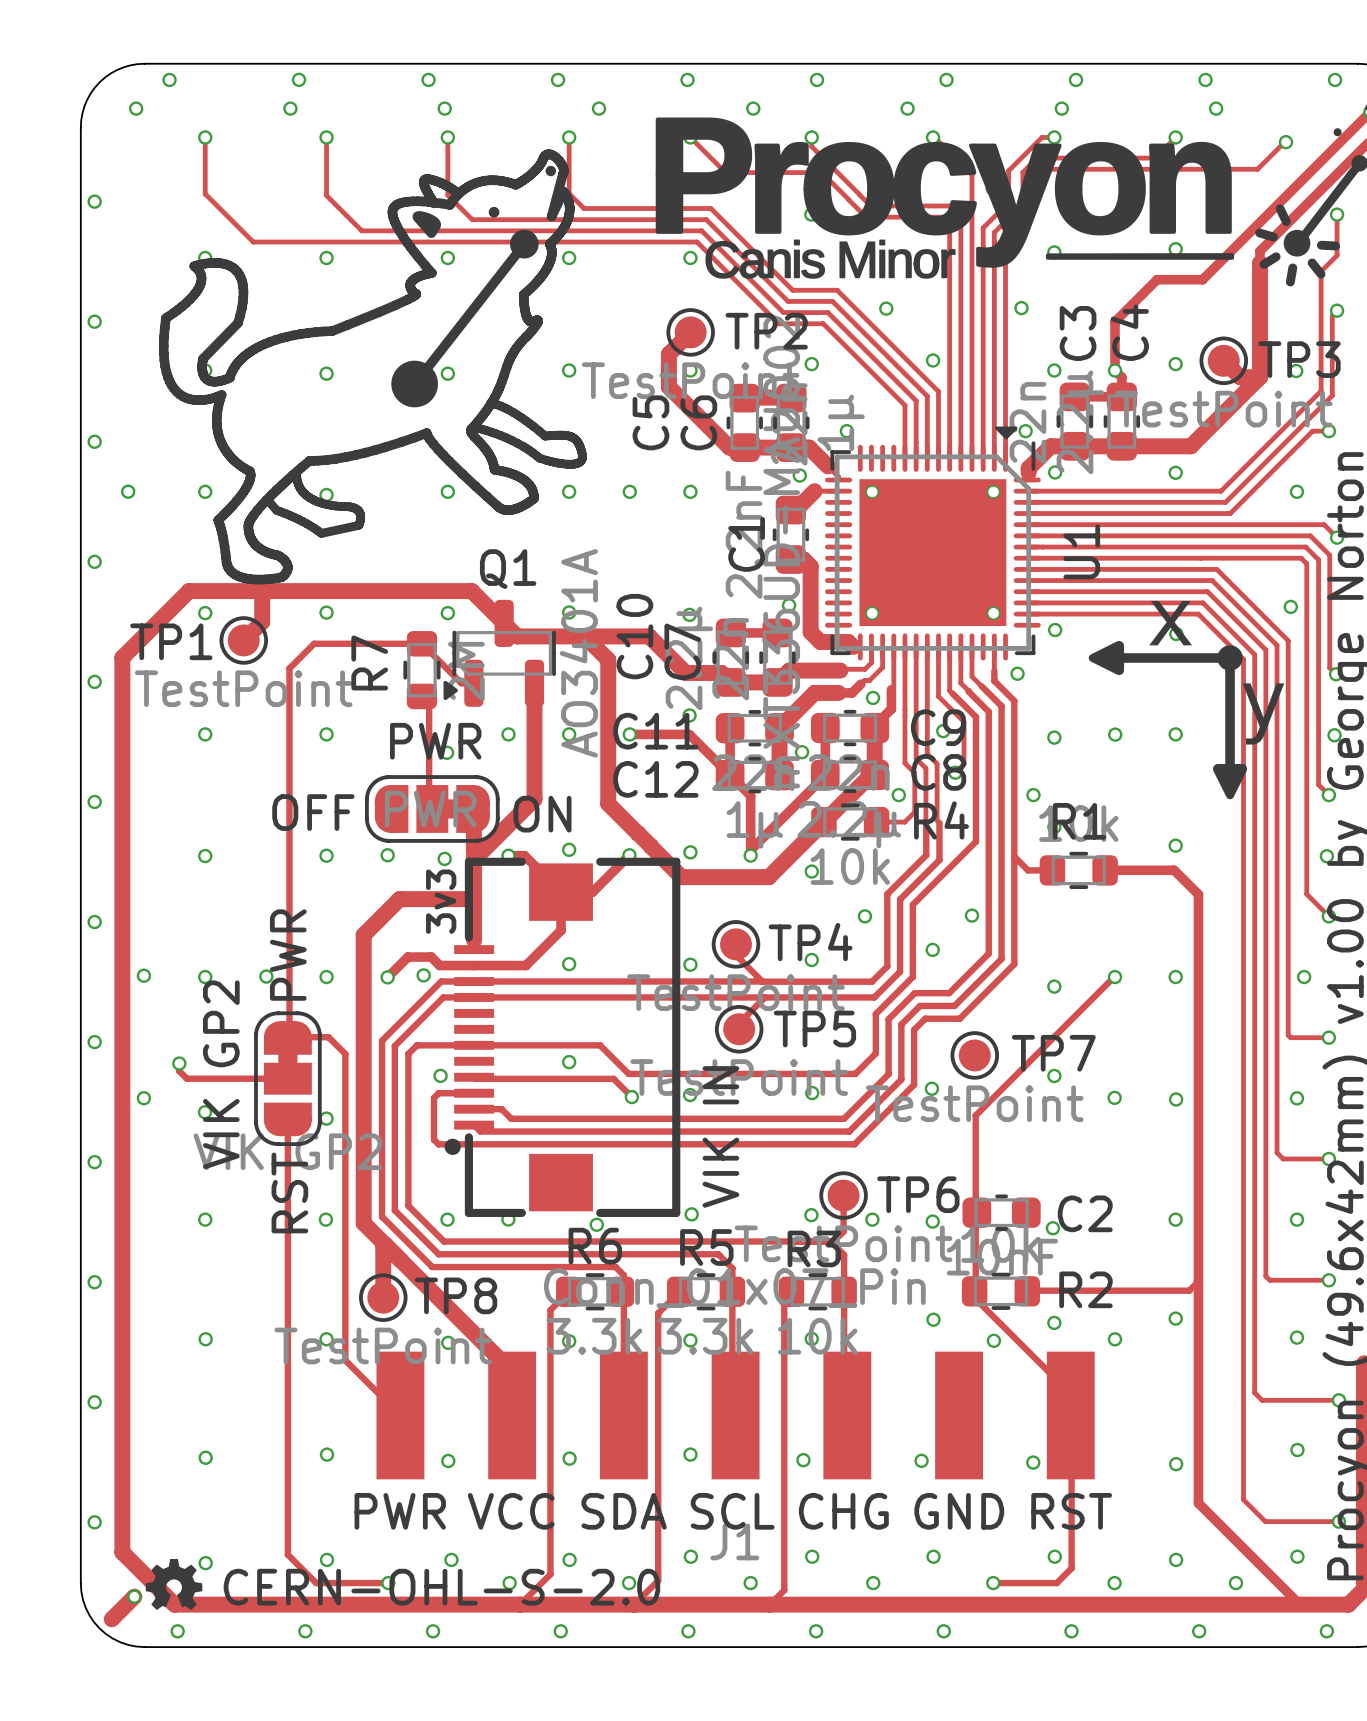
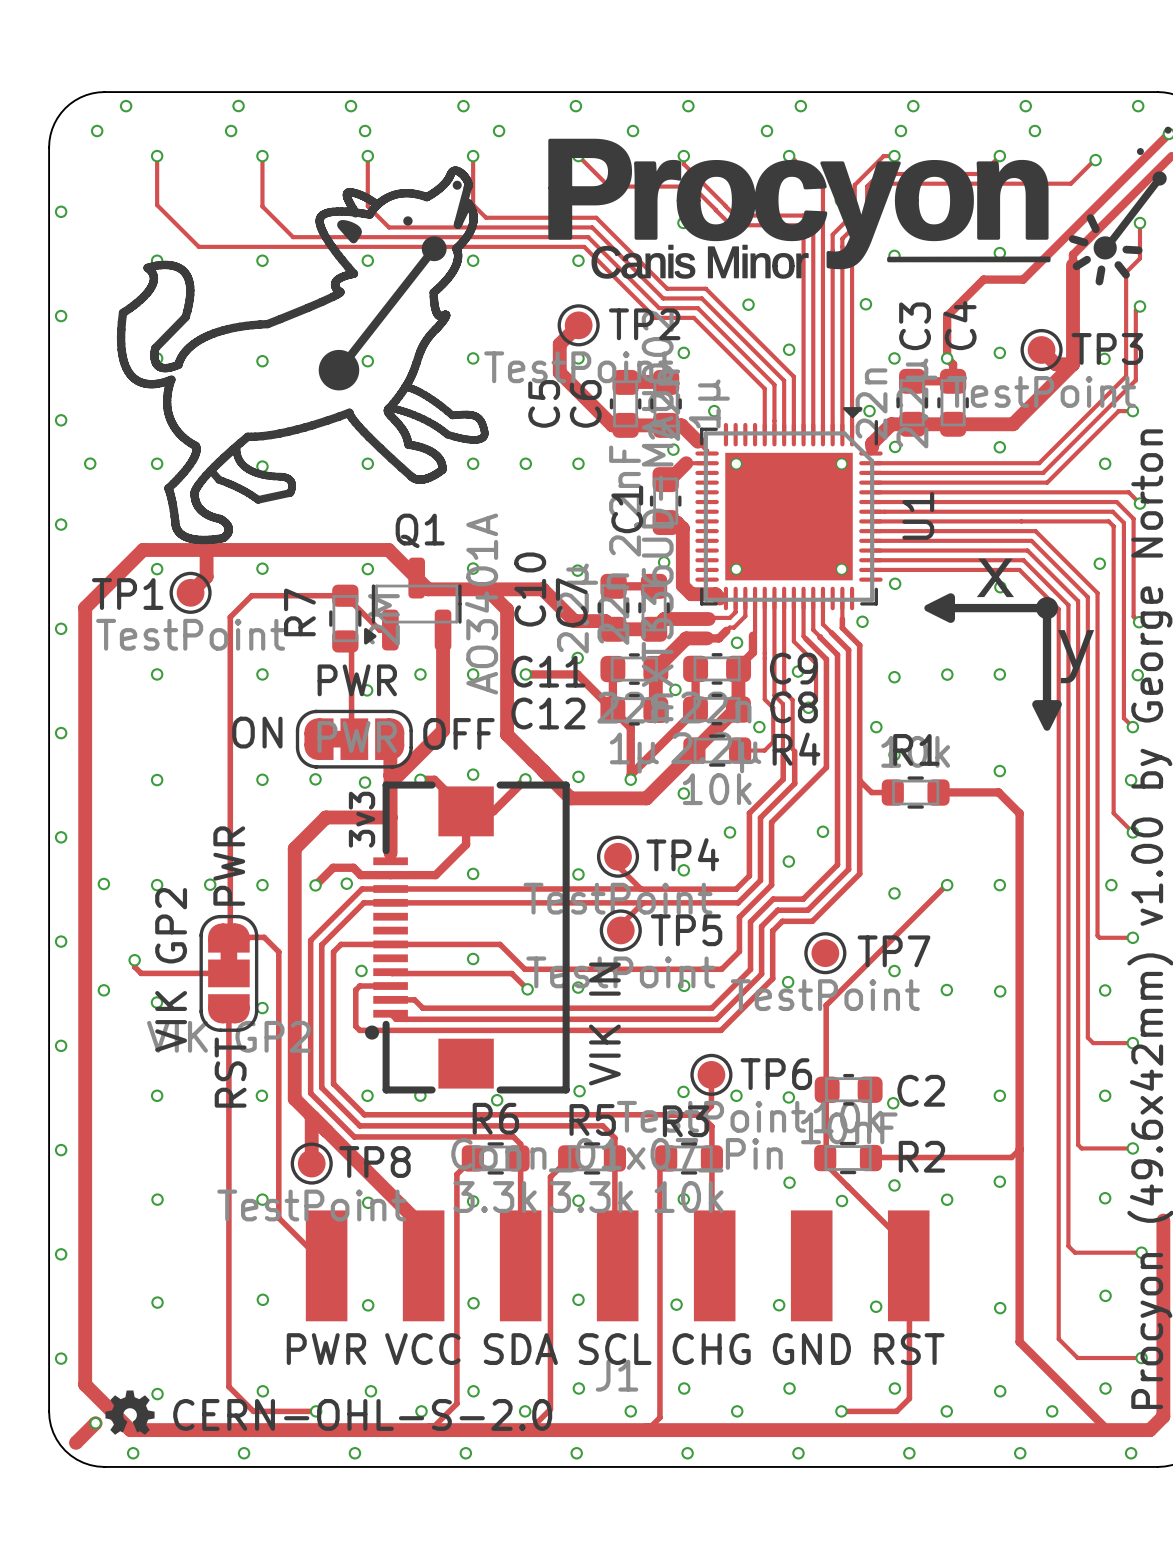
part rotation: 0° (432, 808) -> 180° (354, 739)

